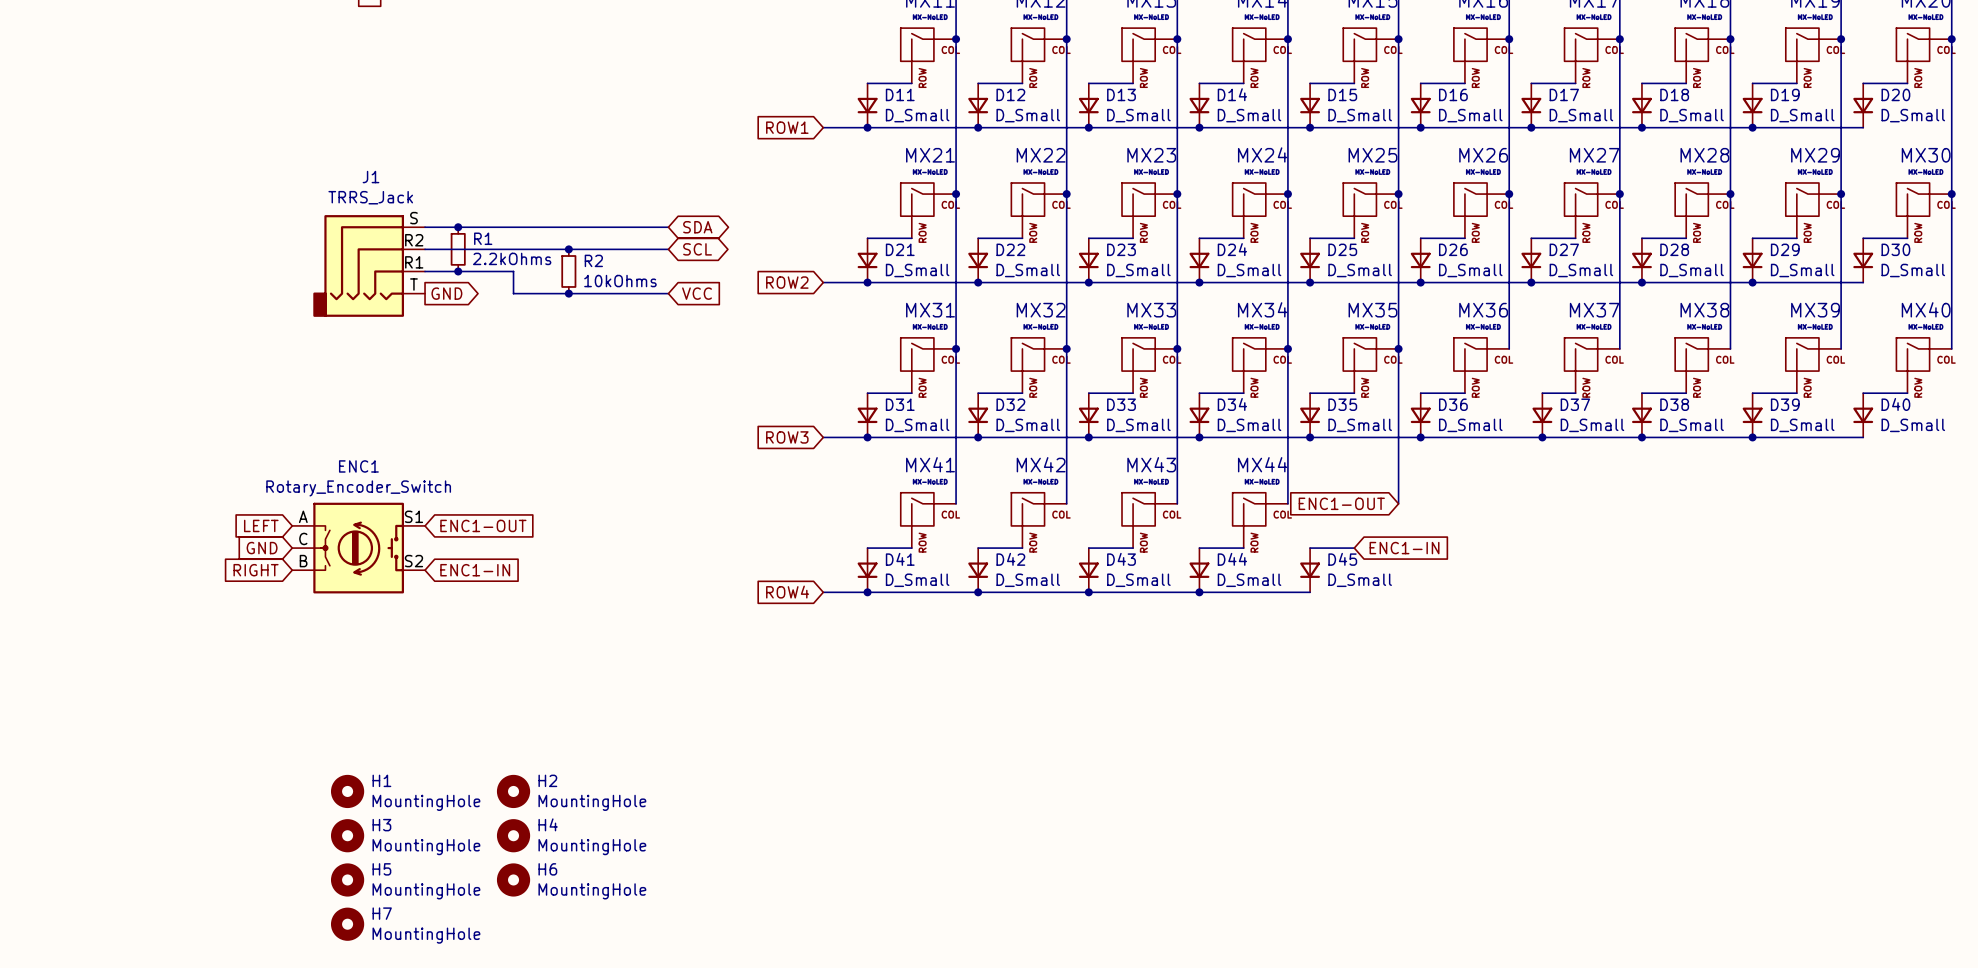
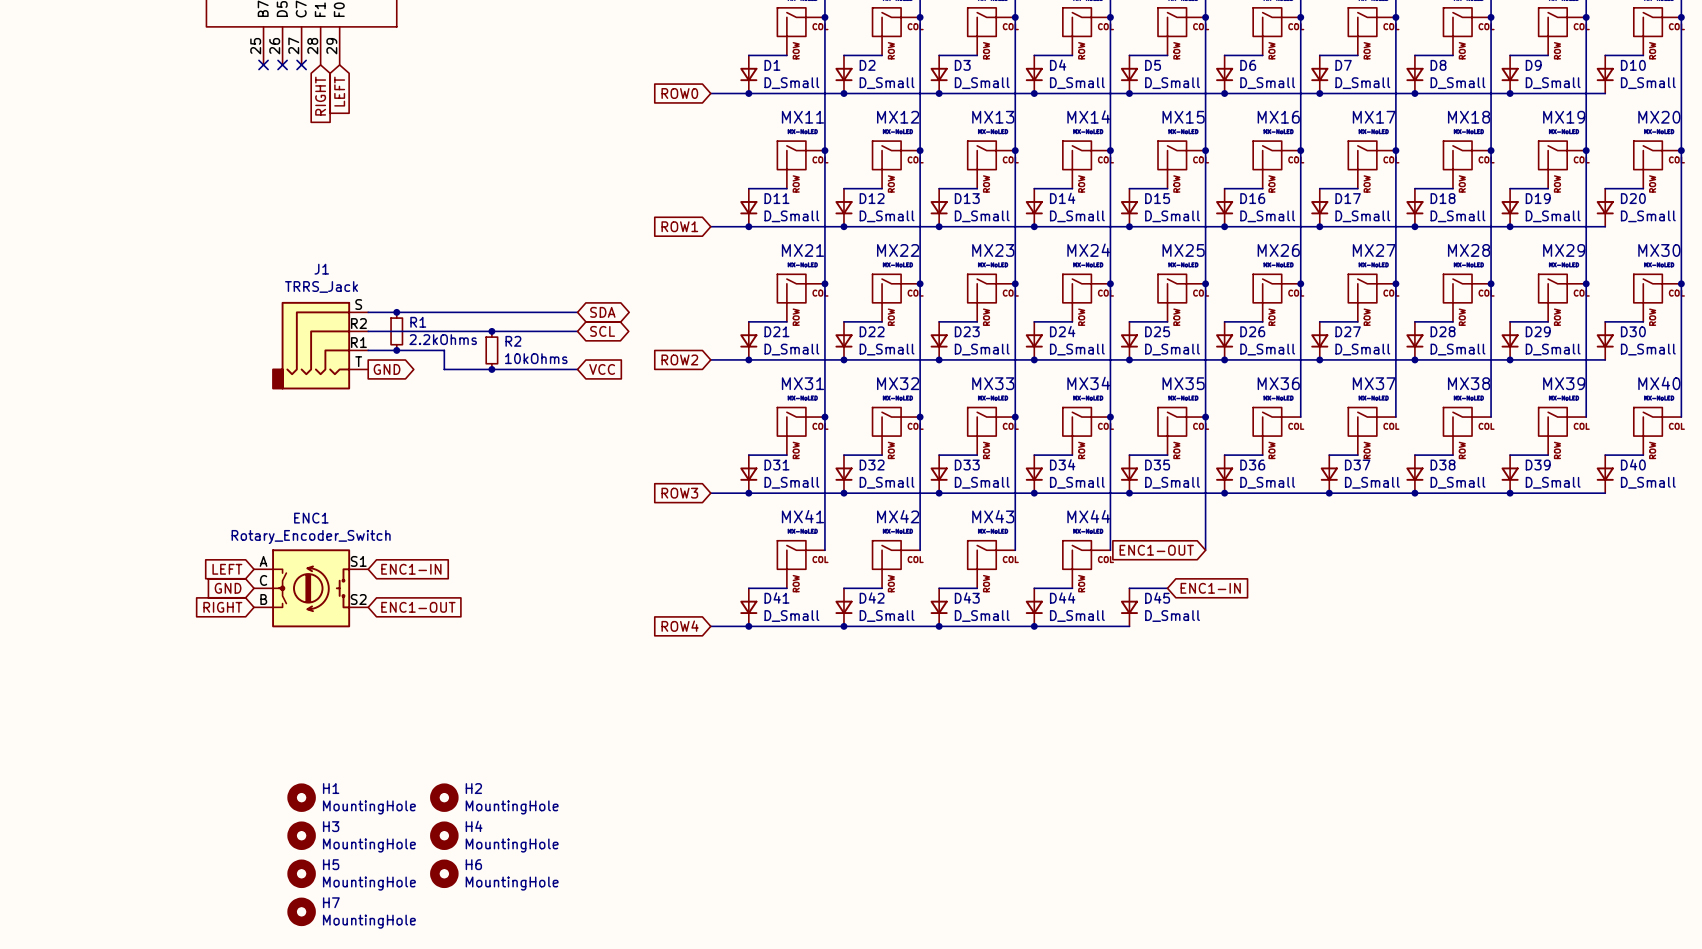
global label: ENC1-OUT (483, 525) -> ENC1-IN (411, 569)
global label: ENC1-IN (475, 570) -> ENC1-OUT (418, 607)

